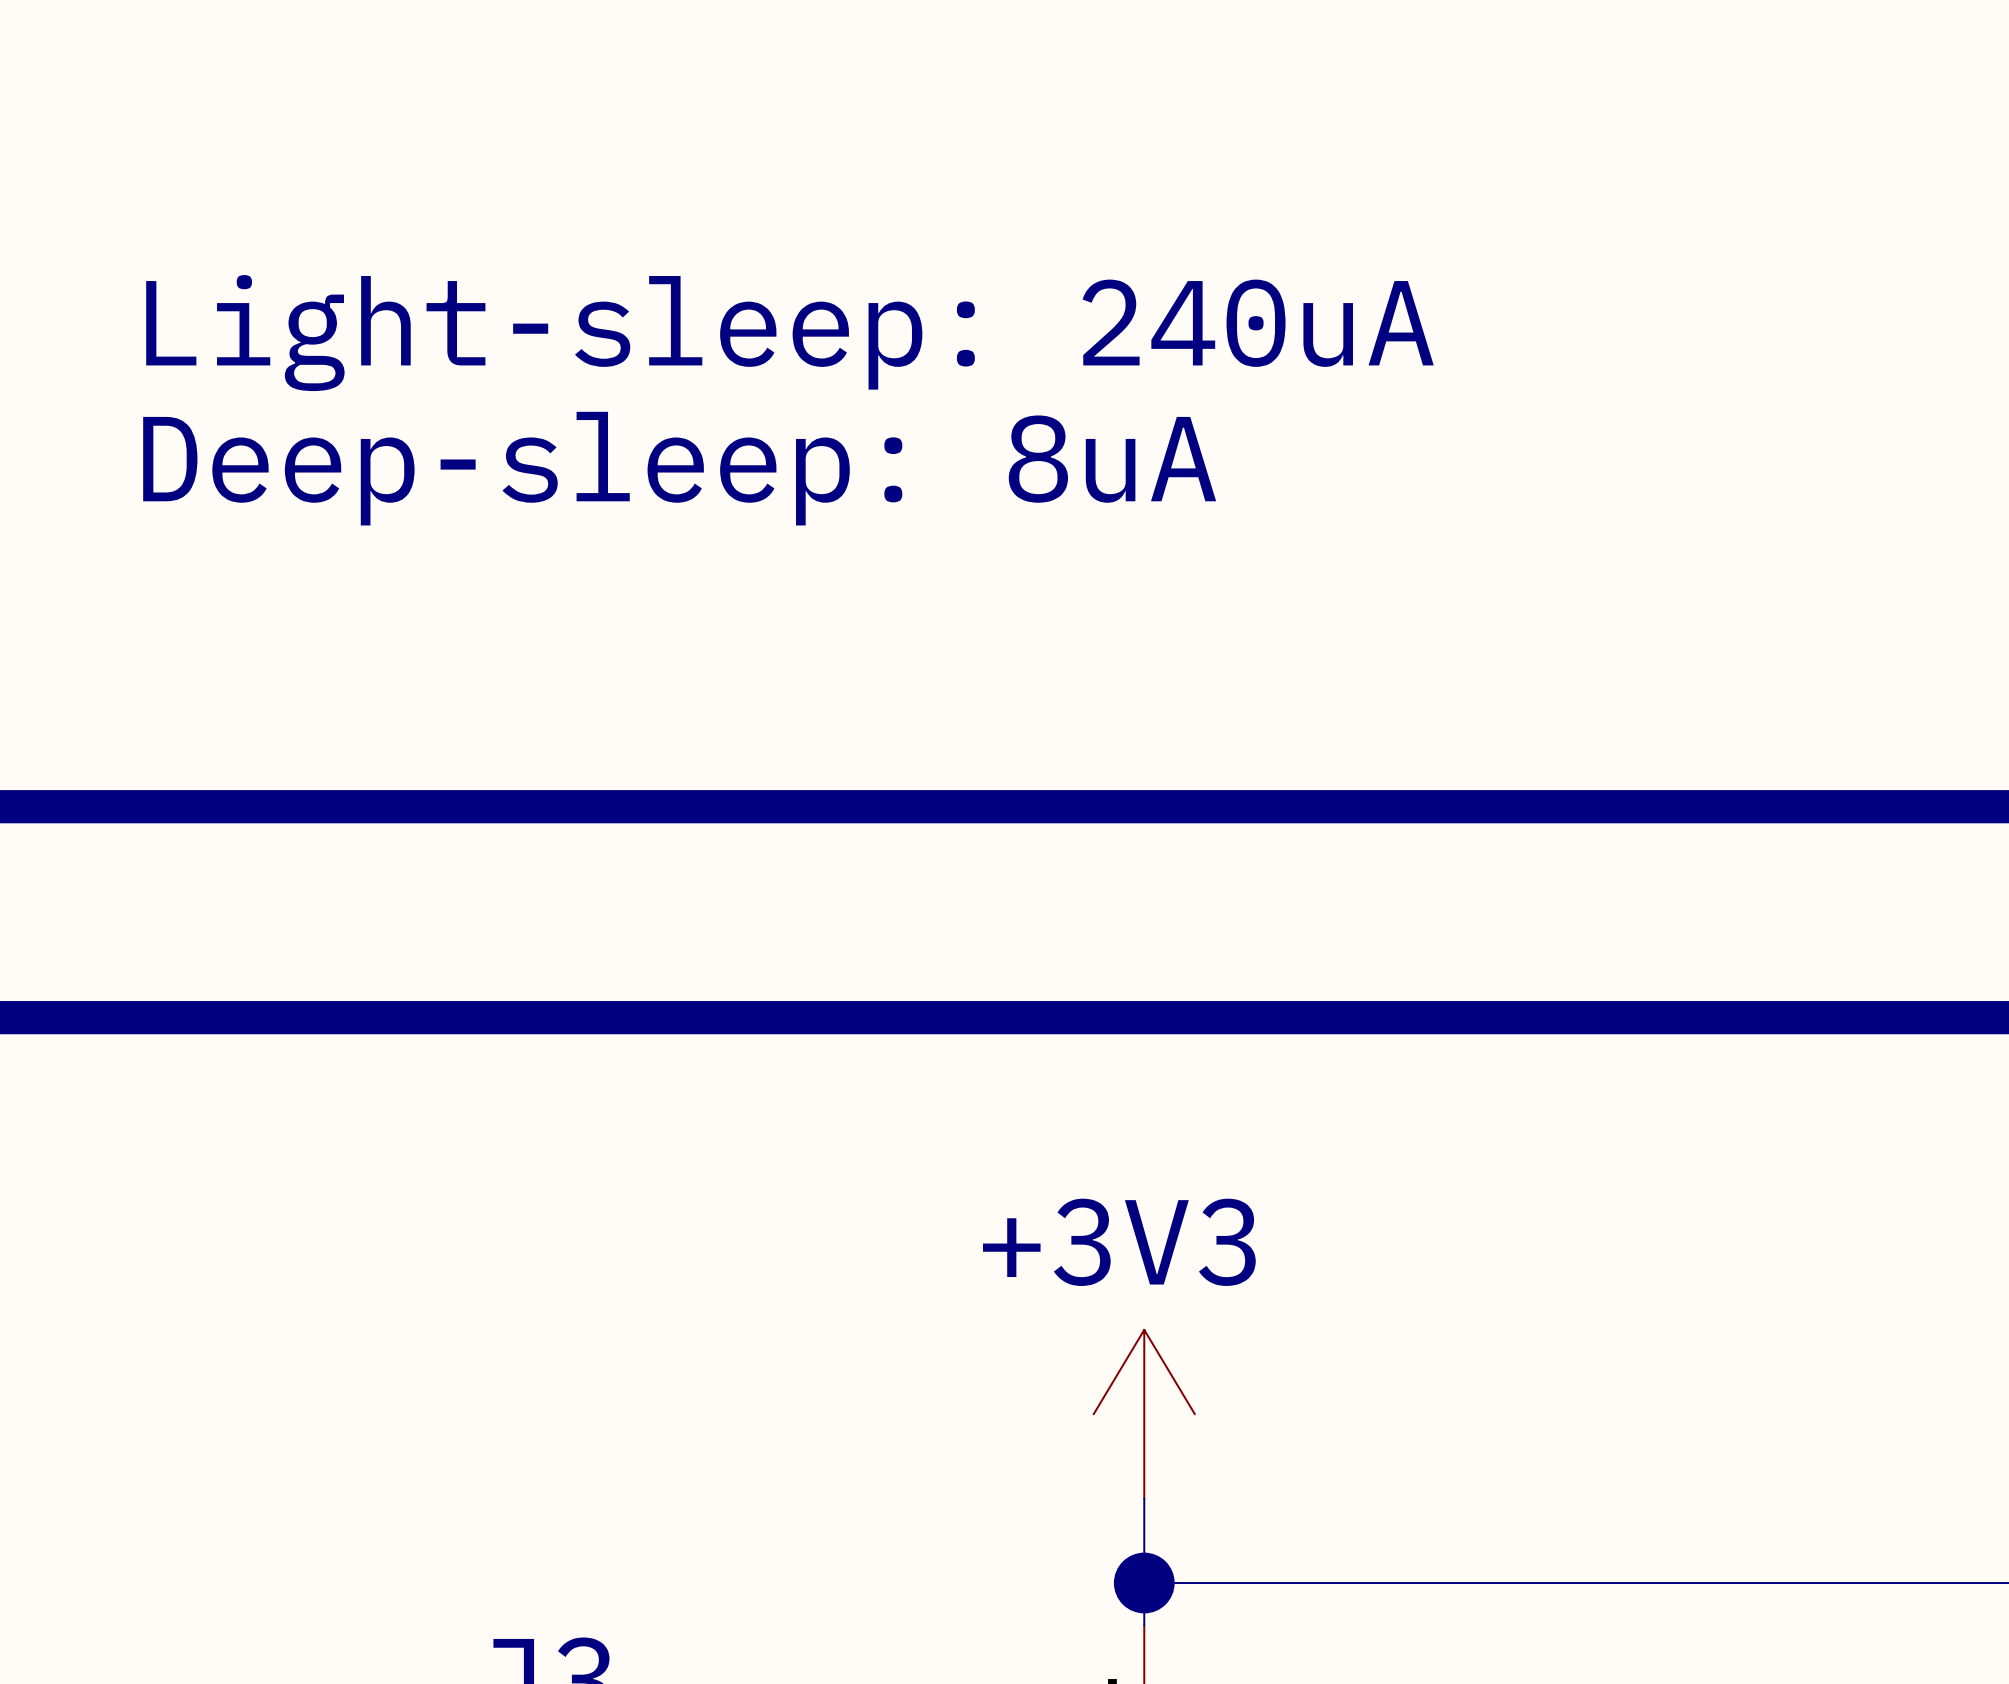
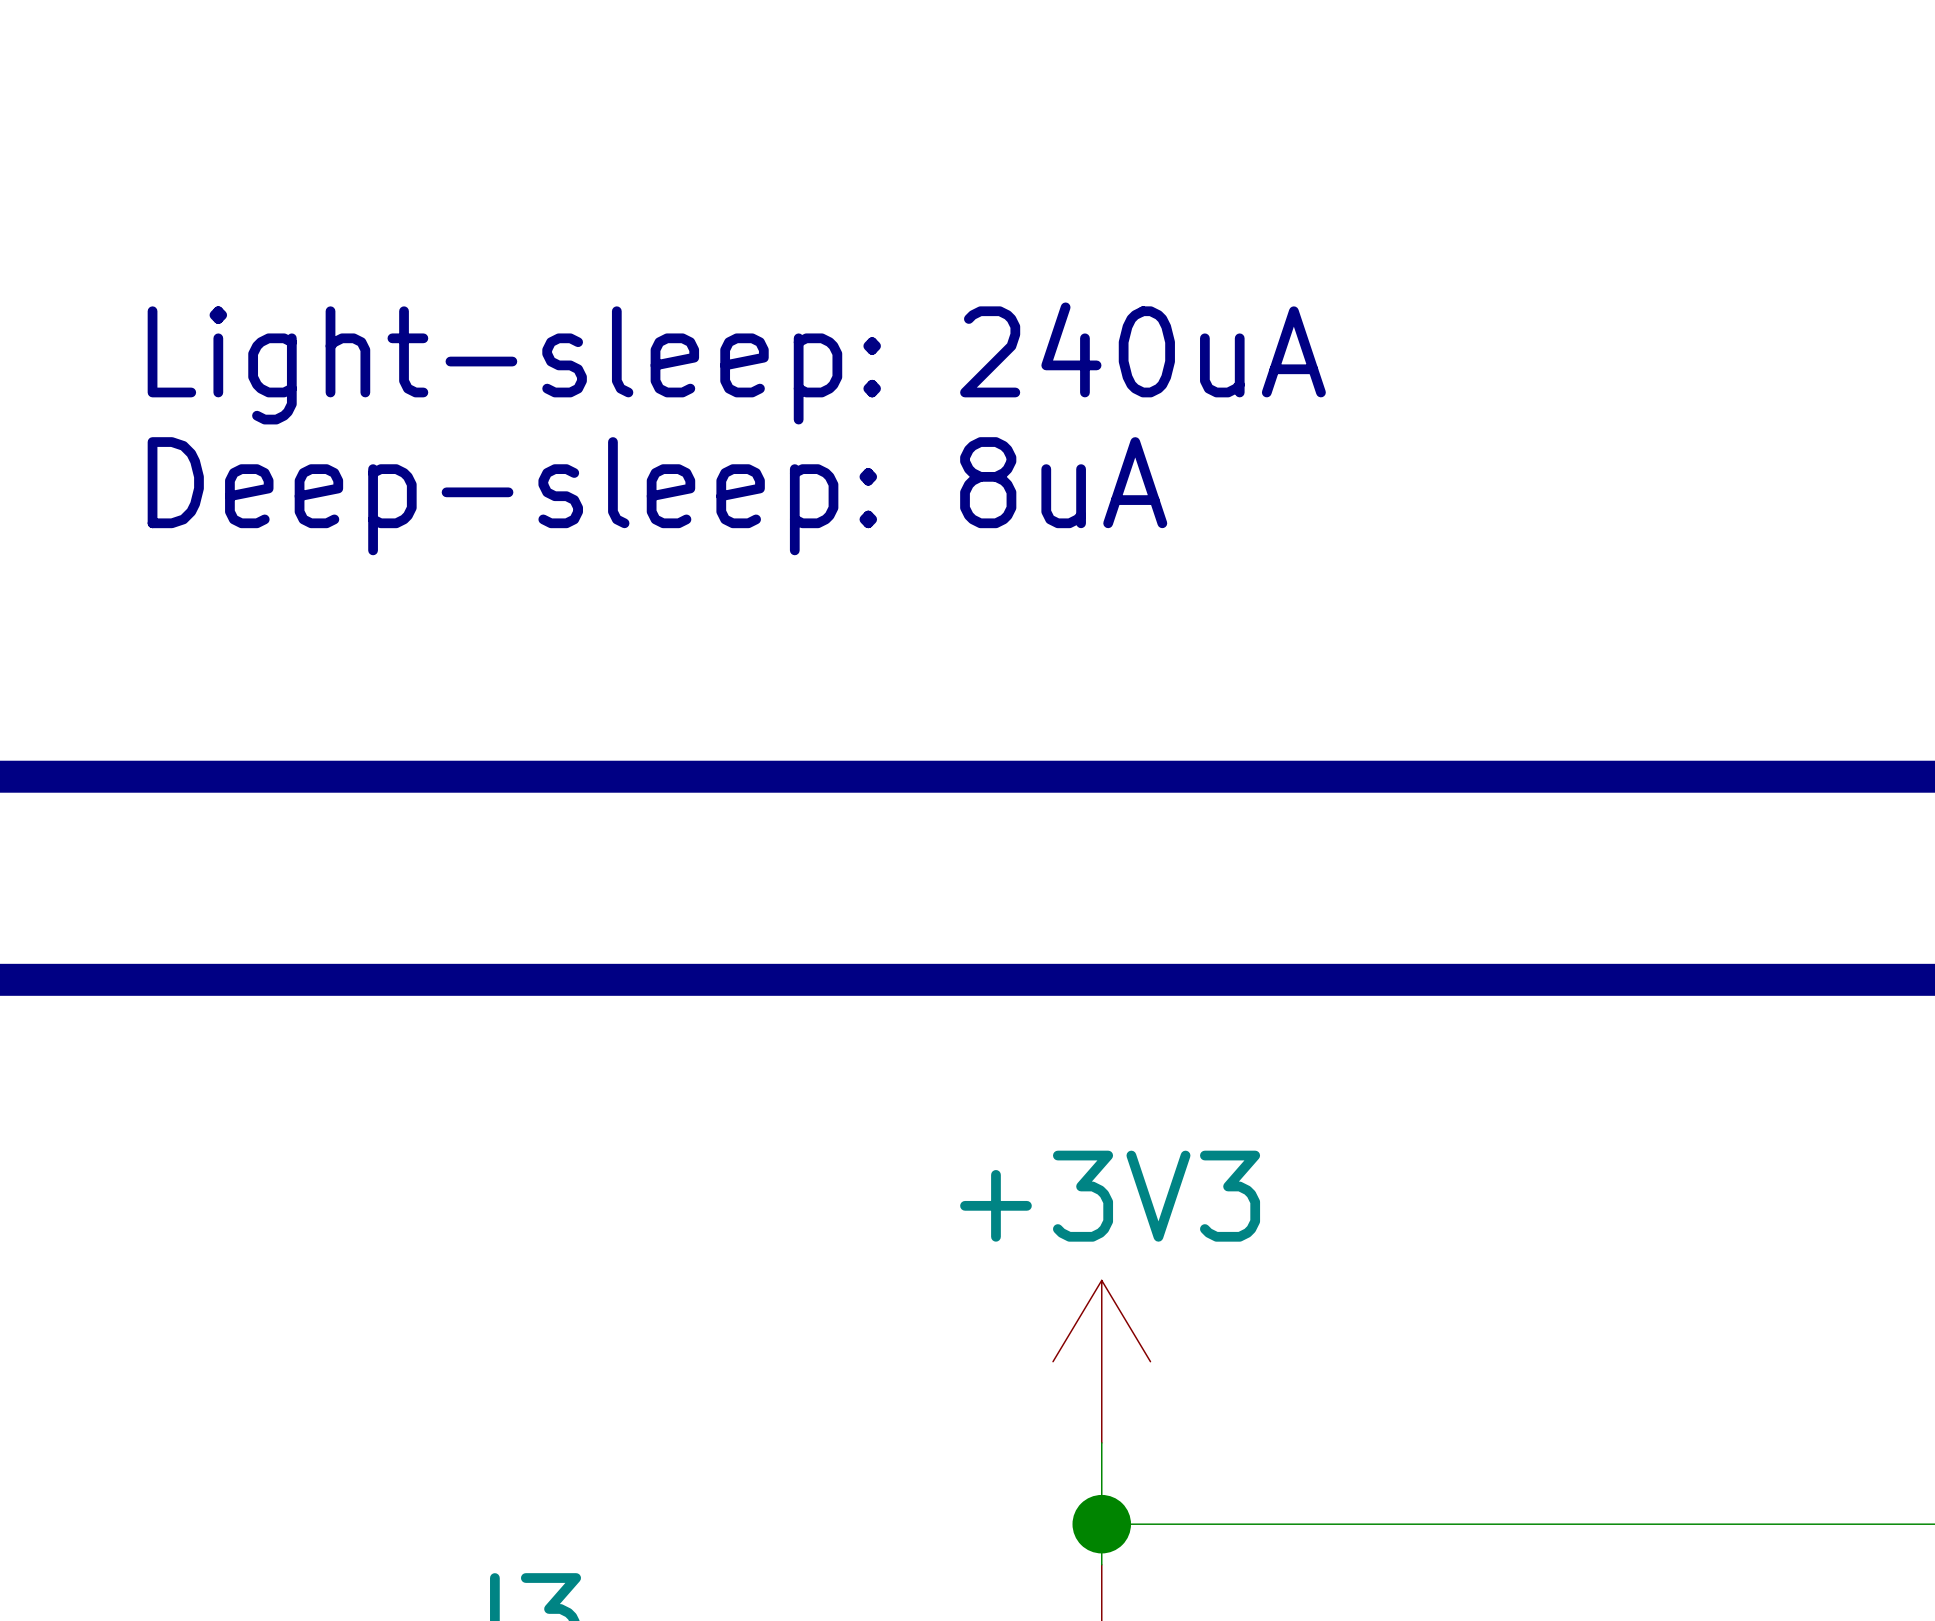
text position: Light-sleep: 240uA (789, 333) -> Light-sleep: 240uA (736, 363)
text position: Deep-sleep: 8uA (679, 468) -> Deep-sleep: 8uA (657, 496)

